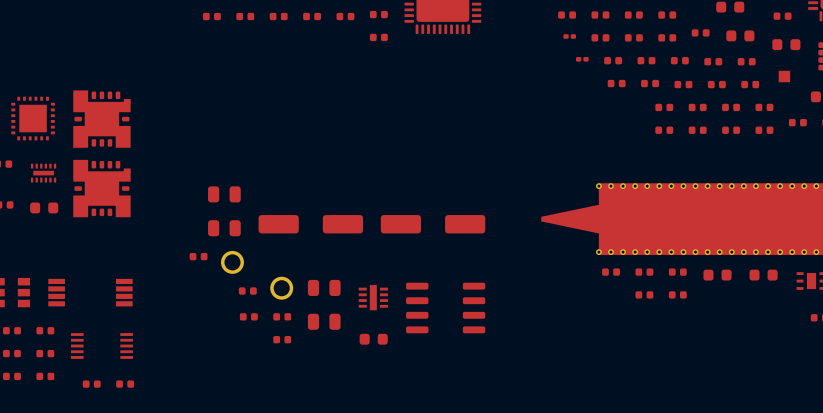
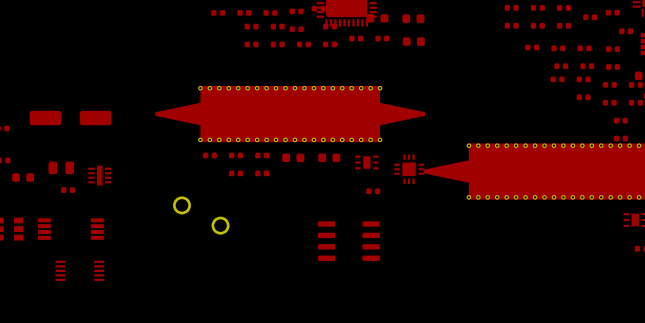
part footprint: [716, 1, 745, 13] -> [556, 5, 571, 11]
part: none -> (511, 7)
part: none -> (537, 7)
part: none -> (318, 8)
part: (567, 15) -> none
part: (600, 15) -> none
part: (633, 15) -> none
part: (667, 15) -> none
part: (211, 16) -> none
part: (245, 16) -> none
part: none -> (590, 17)
part: none -> (377, 18)
part: none -> (413, 18)
part: none -> (511, 25)
part: none -> (537, 25)
part: (700, 32) -> none
part: none -> (563, 25)
part: none -> (251, 26)
part: none -> (277, 26)
part: none -> (330, 26)
part: (740, 35) -> none
part: (569, 36) -> none
part: (600, 37) -> none
part: (633, 37) -> none
part: (667, 37) -> none
part: none -> (626, 31)
part: (786, 44) -> none
part: none -> (356, 38)
part: none -> (382, 38)
part: none -> (413, 41)
part: none -> (251, 44)
part: none -> (277, 44)
part: none -> (303, 44)
part: none -> (330, 44)
part: (582, 59) -> none
part: (613, 60) -> none
part: (646, 60) -> none
part: none -> (612, 49)
part: (784, 76) -> none
part: (616, 83) -> none
part: (650, 83) -> none
part: (683, 84) -> none
part: none -> (612, 67)
part: none -> (557, 79)
part: none -> (583, 79)
part: (664, 107) -> none
part: (697, 107) -> none
part: (731, 107) -> none
part: (764, 107) -> none
part: none -> (609, 84)
part: none -> (635, 84)
part: (33, 118) -> none
part: (101, 119) -> none
part: (797, 122) -> none
part: none -> (583, 97)
part: (664, 130) -> none
part: (697, 130) -> none
part: (731, 130) -> none
part: (764, 130) -> none
part: none -> (609, 102)
part: none -> (635, 102)
part: none -> (290, 114)
part: none -> (70, 118)
part: none -> (620, 120)
part: (43, 173) -> none
part: none -> (620, 138)
part: (101, 188) -> none
part: (224, 194) -> none
part: none -> (209, 155)
part: none -> (236, 155)
part: none -> (262, 155)
part: none -> (293, 157)
part: none -> (329, 157)
part position: (44, 207) -> (23, 177)
part: none -> (366, 162)
part: none -> (61, 167)
part footprint: [258, 215, 364, 234] -> [229, 170, 244, 177]
part: none -> (409, 169)
part: none -> (262, 173)
part: (433, 224) -> none
part: (224, 228) -> none
part: none -> (68, 190)
part: none -> (373, 191)
part: (198, 256) -> none
part: (611, 272) -> none
part: (644, 272) -> none
part: (677, 272) -> none
part: (717, 275) -> none
part: (763, 275) -> none
part: (324, 287) -> none
part: (247, 291) -> none
part: (644, 294) -> none
part: (677, 294) -> none
part position: (373, 297) -> (99, 175)
part: (248, 316) -> none
part: (282, 316) -> none
part: (324, 321) -> none
part: (11, 330) -> none
part: (45, 330) -> none
part: (282, 339) -> none
part: (373, 339) -> none
part: (11, 353) -> none
part: (45, 353) -> none
part: (11, 376) -> none
part: (45, 376) -> none
part: (91, 384) -> none
part: (125, 384) -> none

